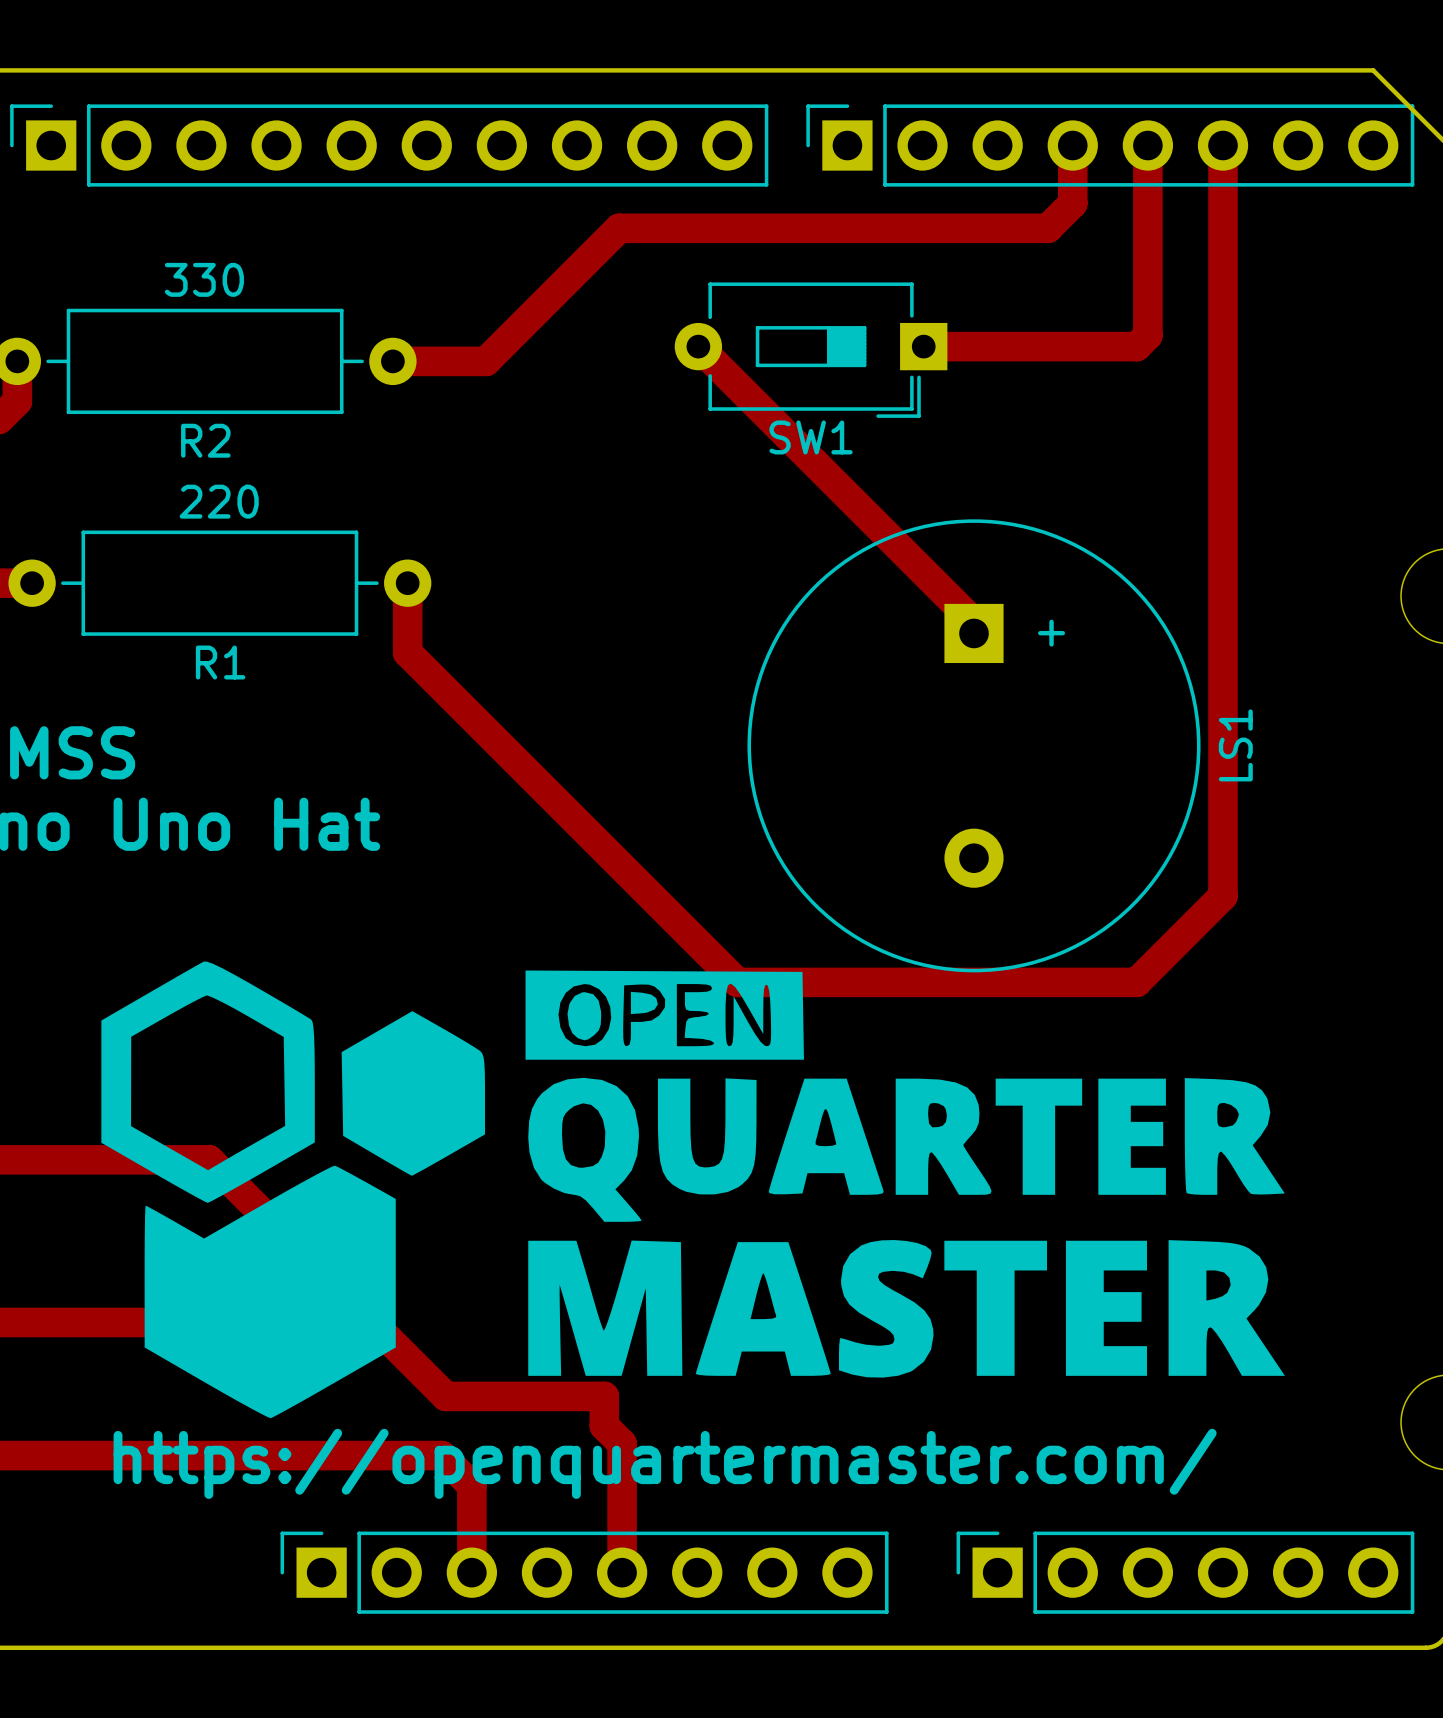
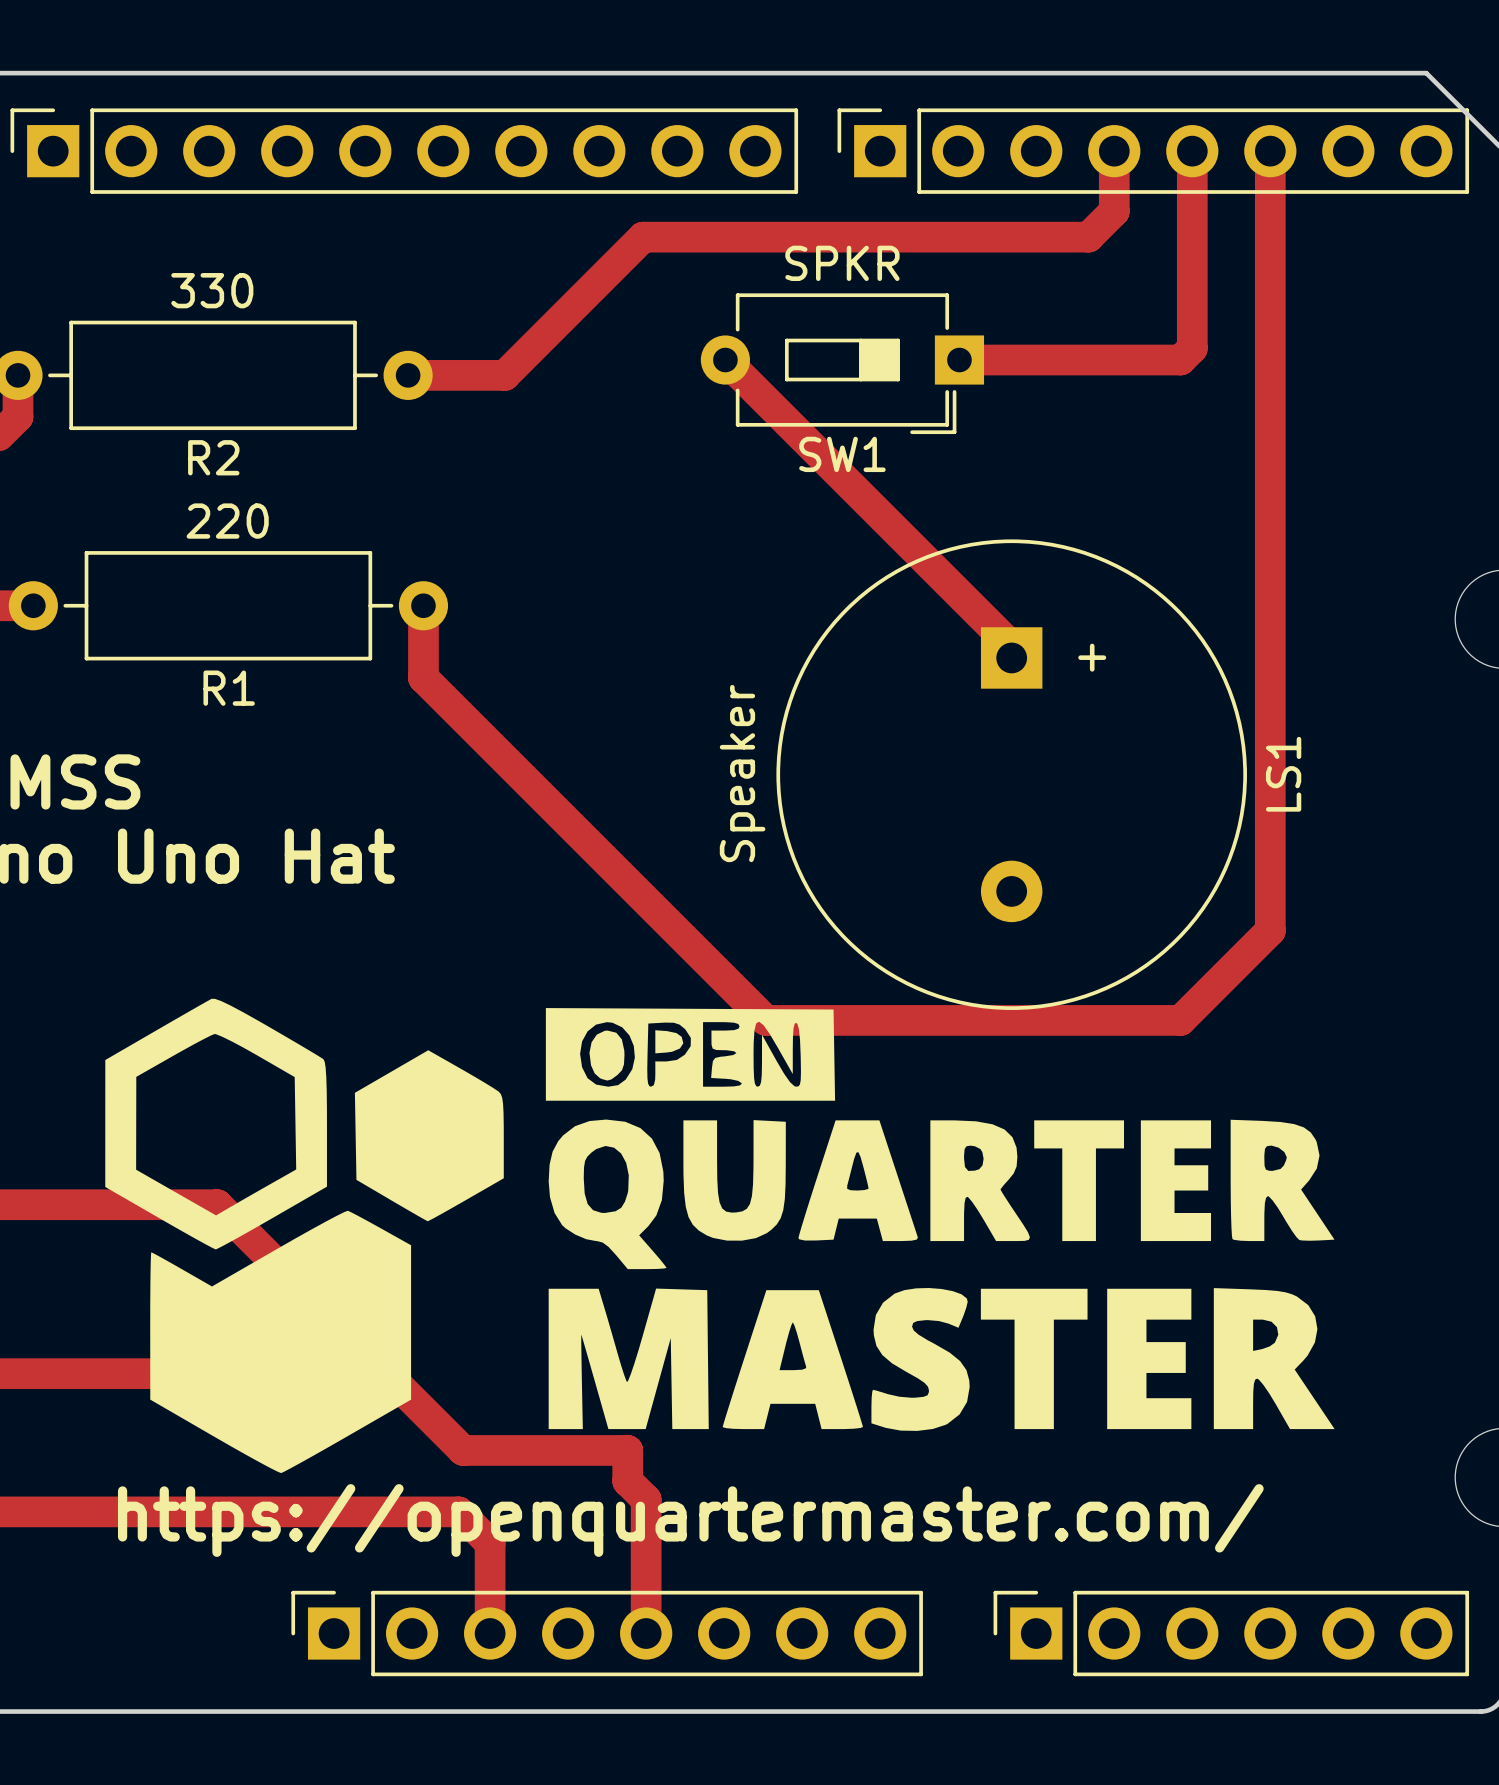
SW1 value: none -> SPKR (842, 263)
LS1 value: none -> Speaker (742, 773)

